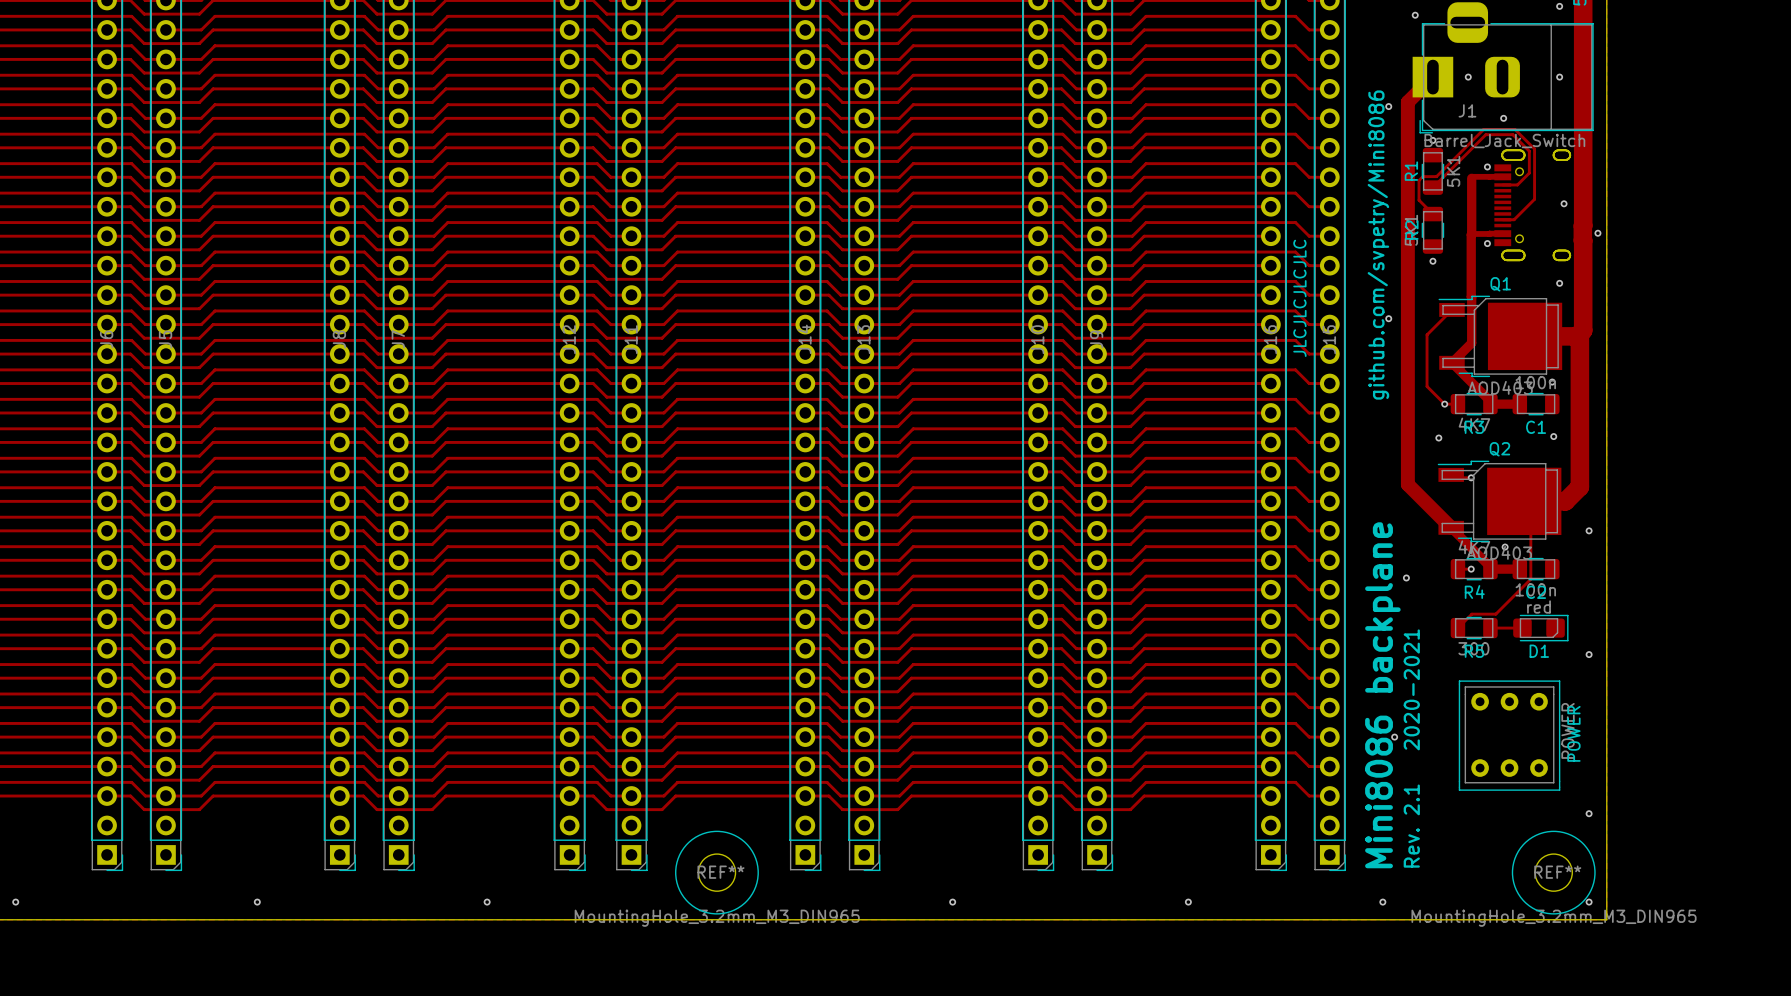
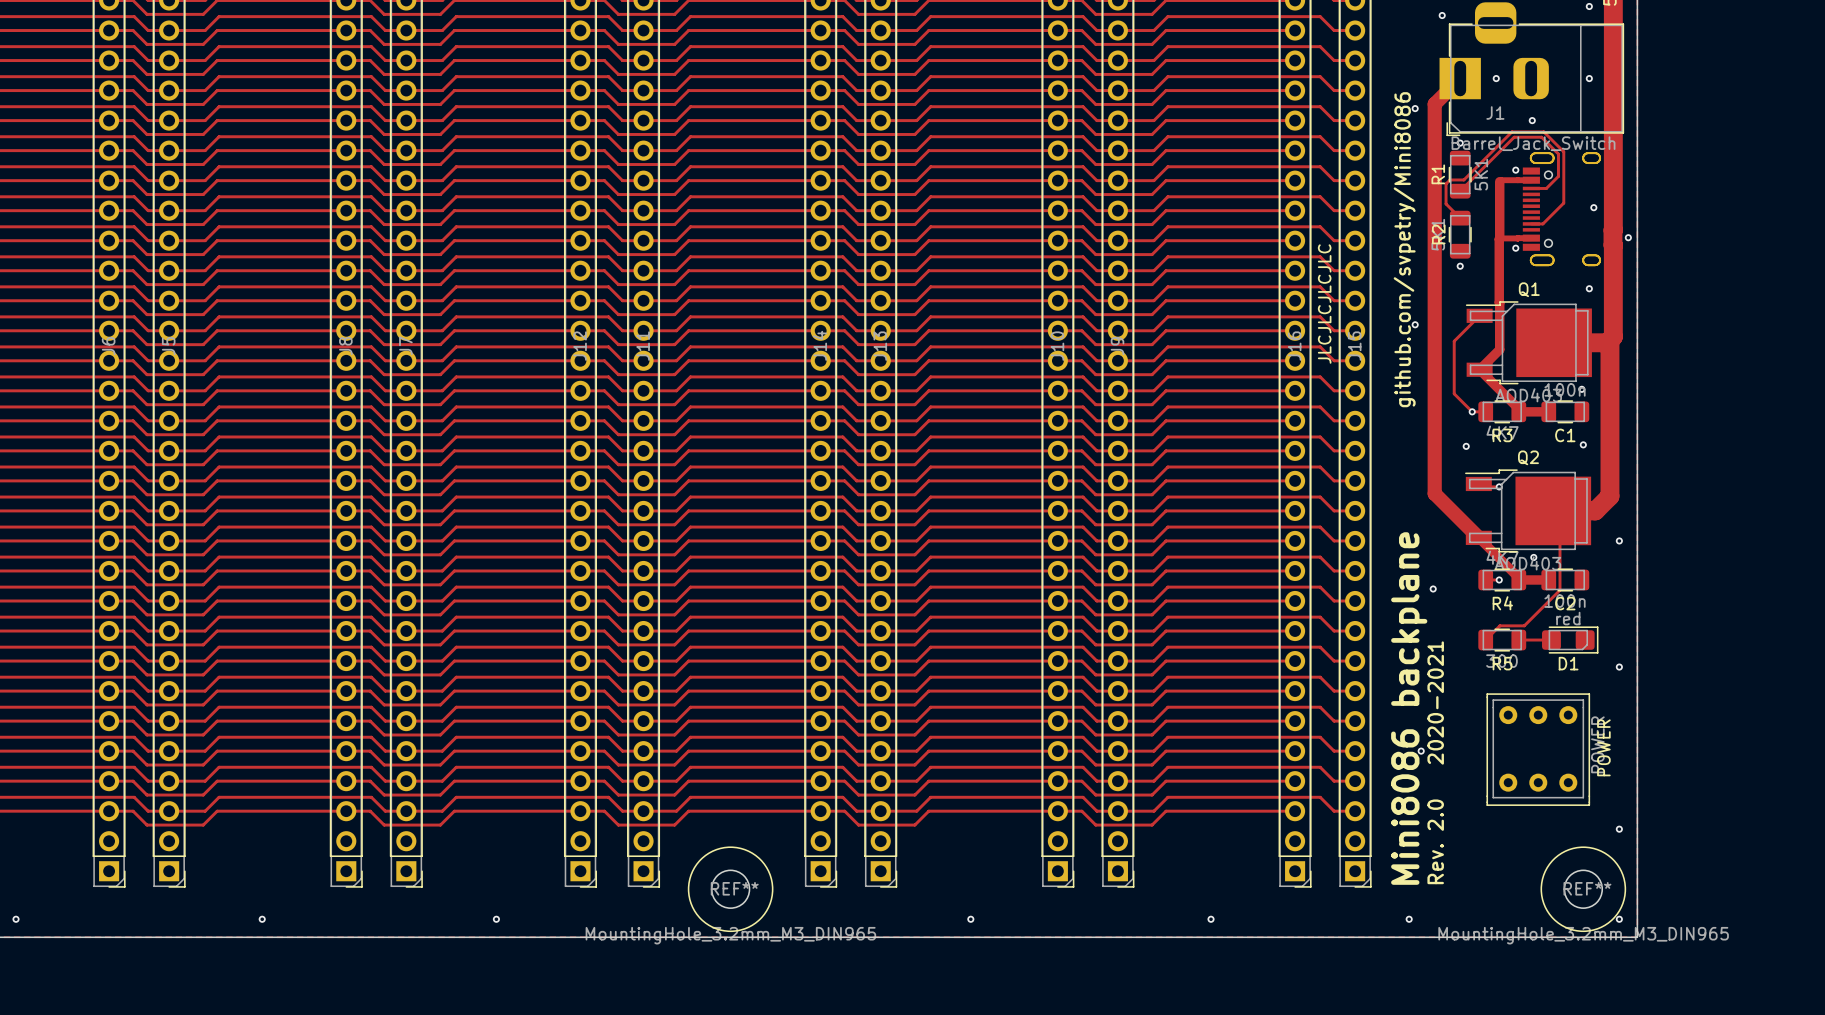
text: Rev. 2.1 2020-2021 (1411, 748) -> Rev. 2.0 2020-2021 (1435, 762)

